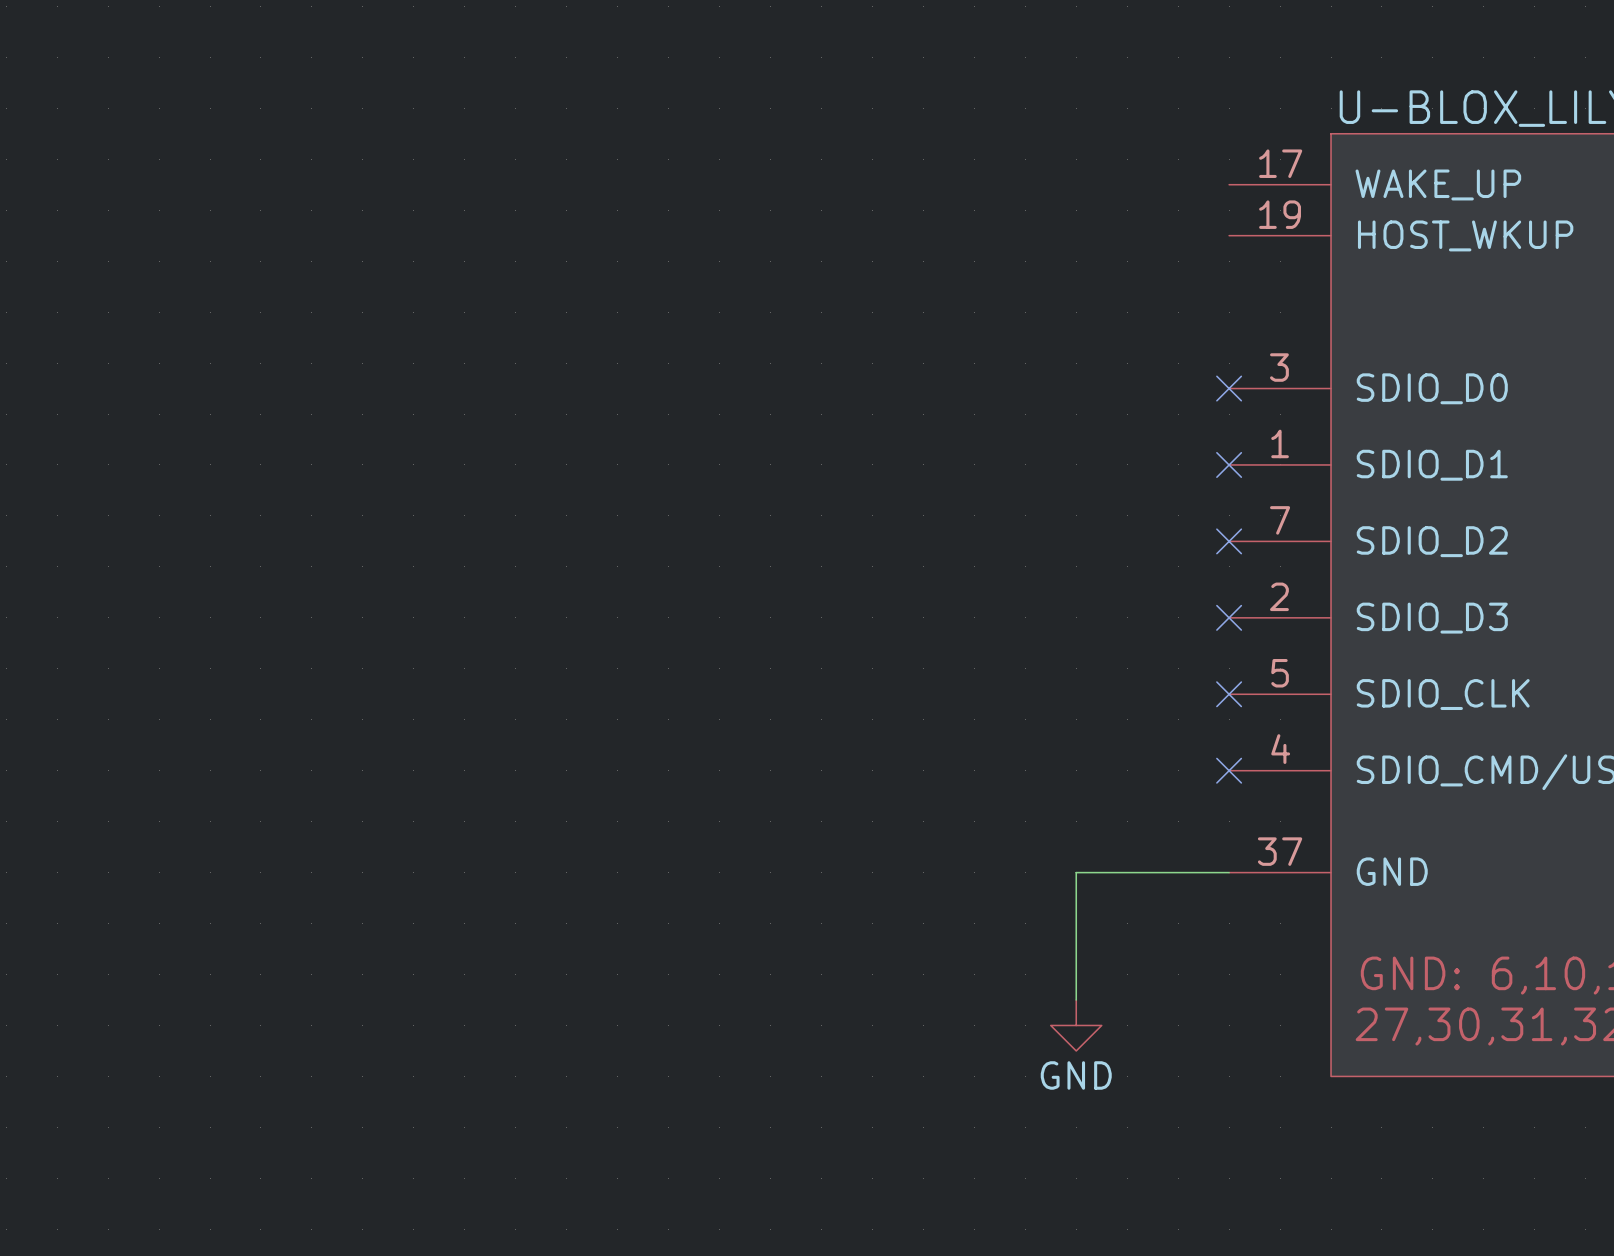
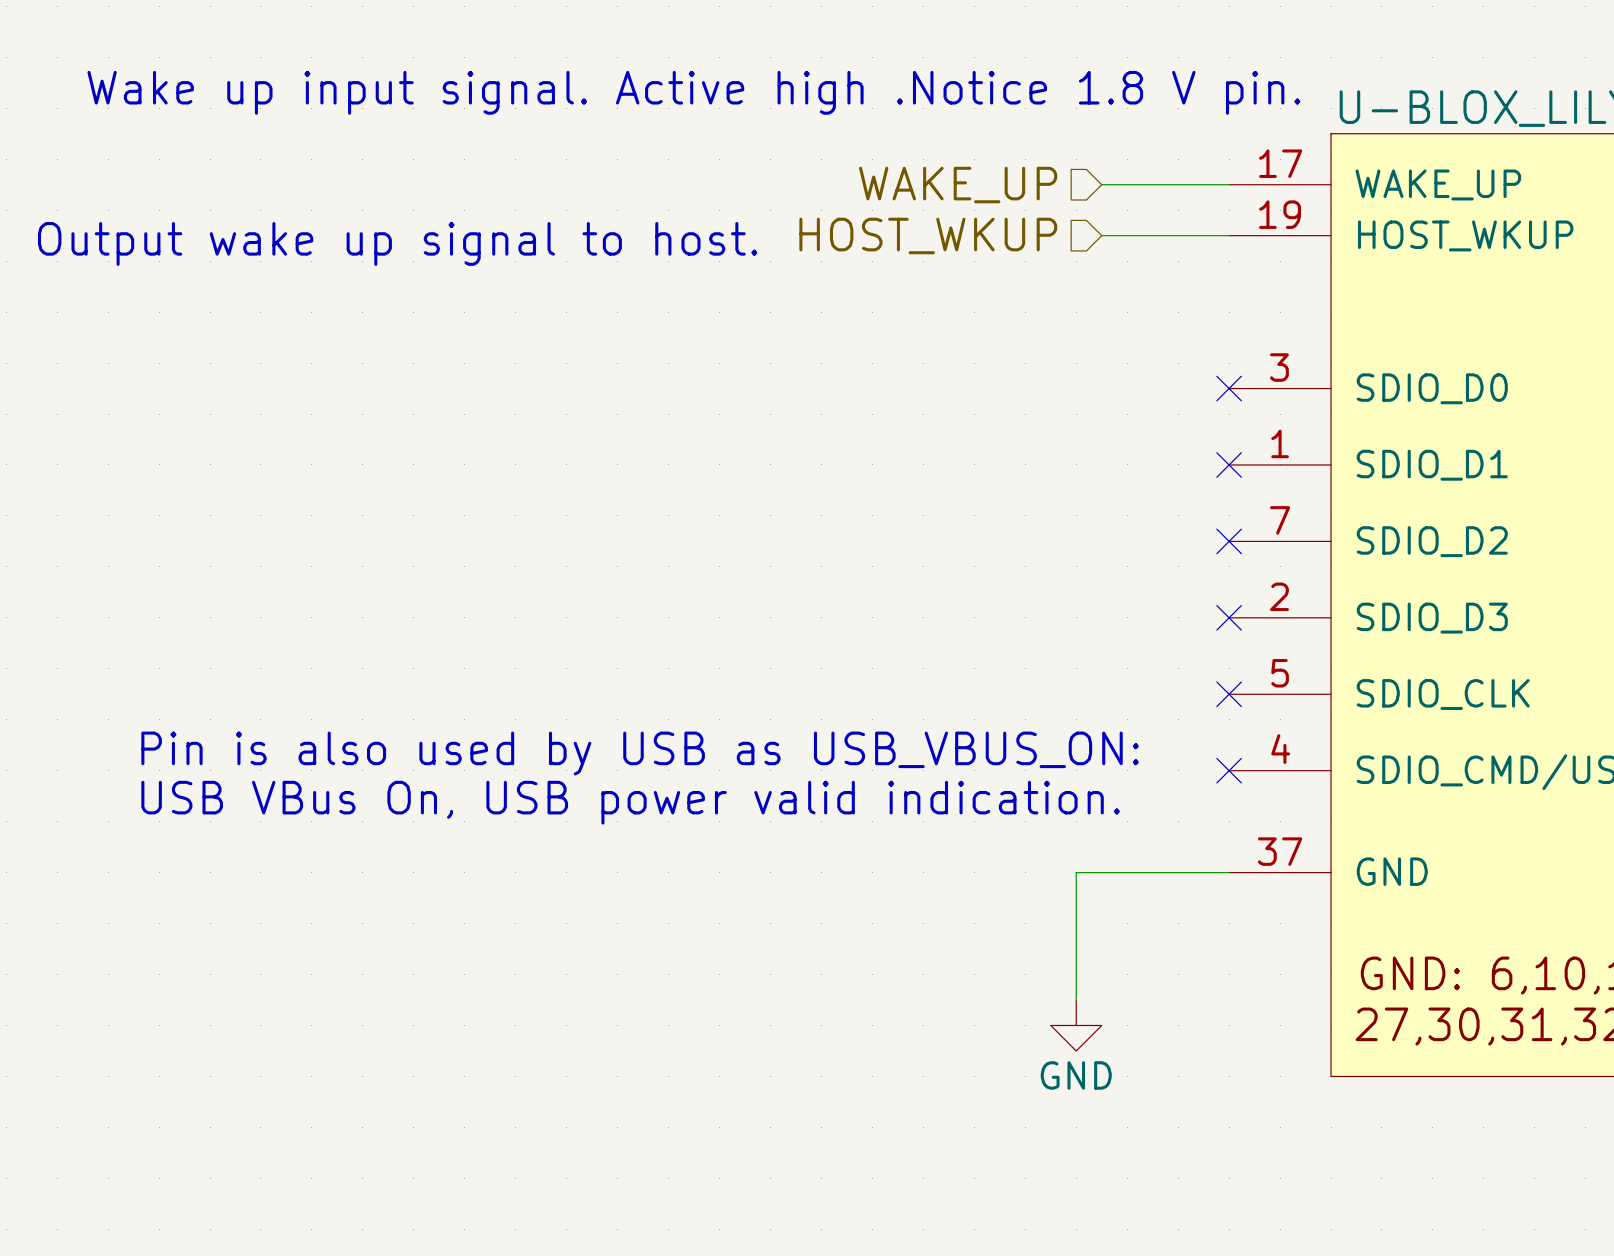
text: none -> Wake up input signal. Active high .Notice 1.8 V pin. (693, 92)
wire: none -> (1101, 184) (1229, 184)
hierarchical label: none -> WAKE_UP (958, 185)
hierarchical label: none -> HOST_WKUP (928, 235)
wire: none -> (1101, 235) (1229, 235)
text: none -> Output wake up signal to host. (397, 243)
text: none -> Pin is also used by USB as USB_VBUS_ON: (640, 753)
text: none -> USB VBus On, USB power valid indication. (630, 802)

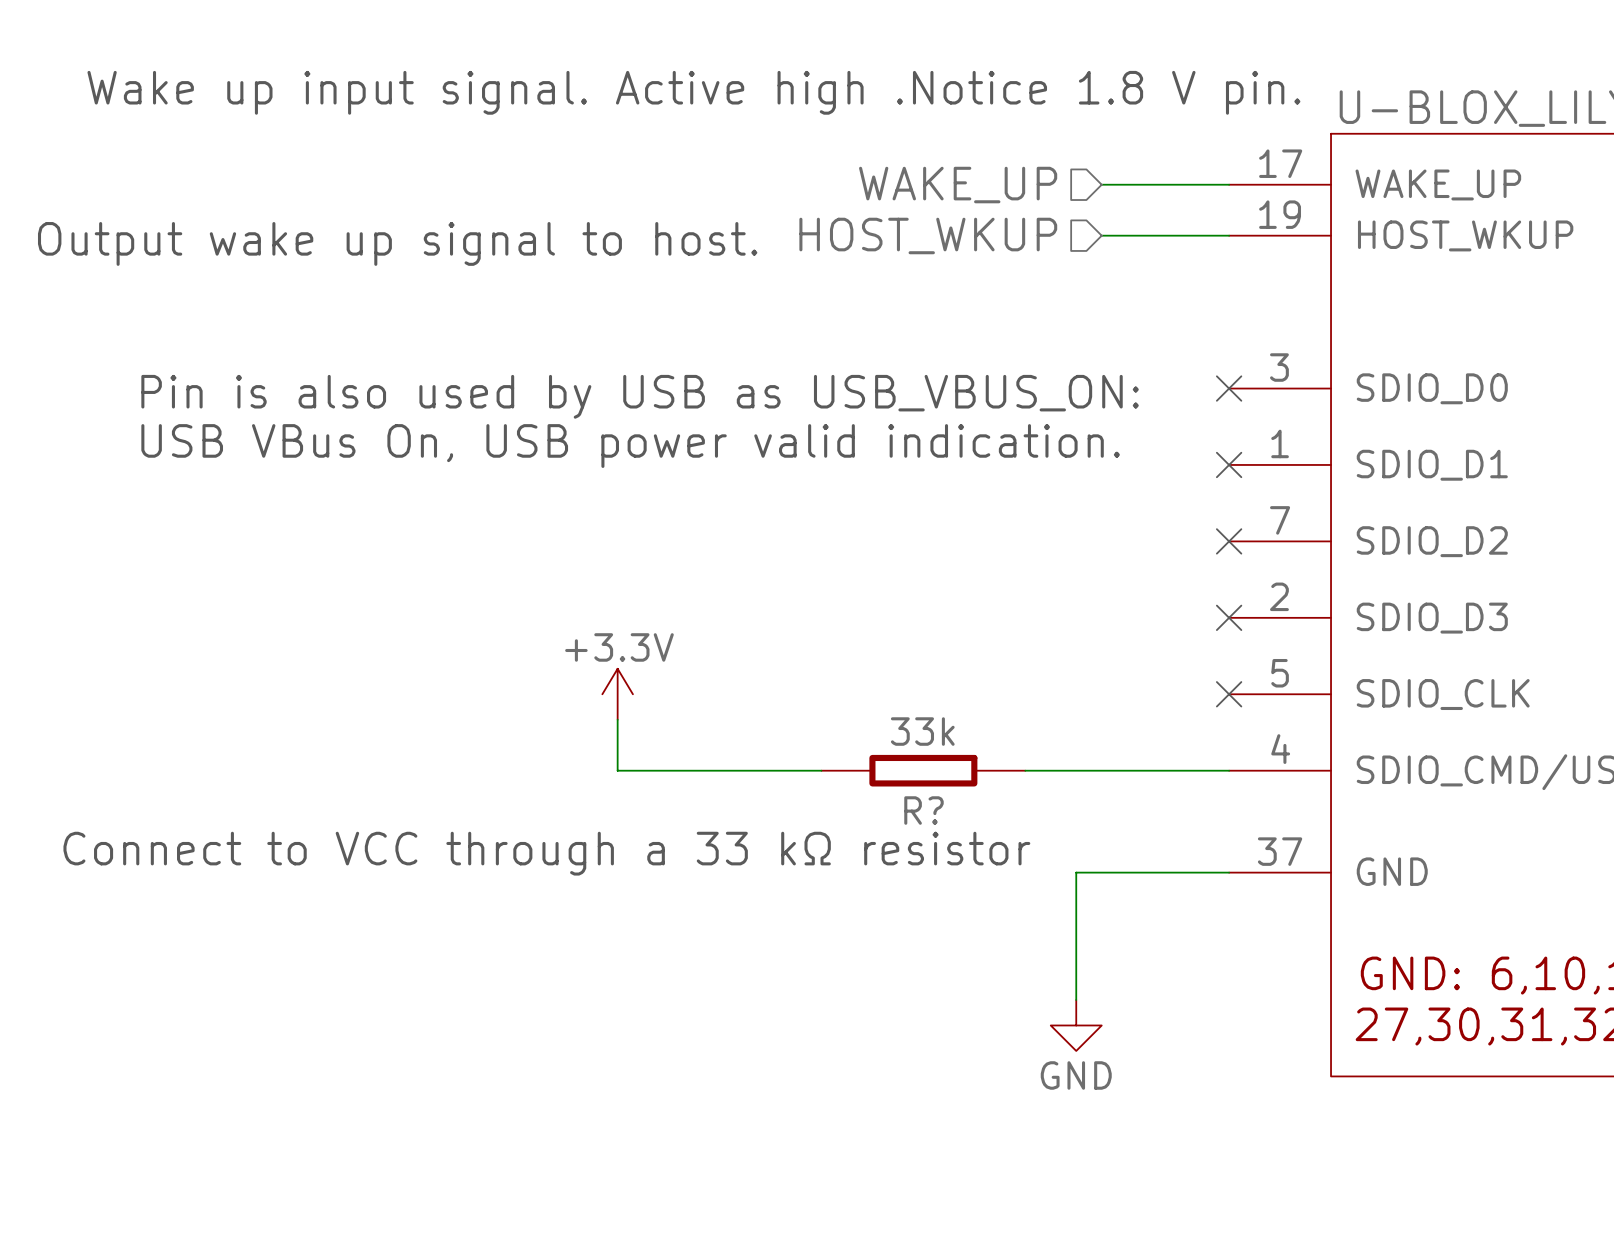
power symbol: none -> +3.3V (617, 694)
wire: none -> (617, 719) (617, 770) (821, 770)
text position: Pin is also used by USB as USB_VBUS_ON: (640, 753) -> Pin is also used by USB as USB_VBUS_ON: (640, 396)
R?: none -> 33k (923, 770)
wire: none -> (1025, 770) (1229, 770)
no-connect mark: (1229, 770) -> none
text position: USB VBus On, USB power valid indication. (630, 802) -> USB VBus On, USB power valid indication. (630, 446)
text: none -> Connect to VCC through a 33 kΩ resistor (546, 853)

